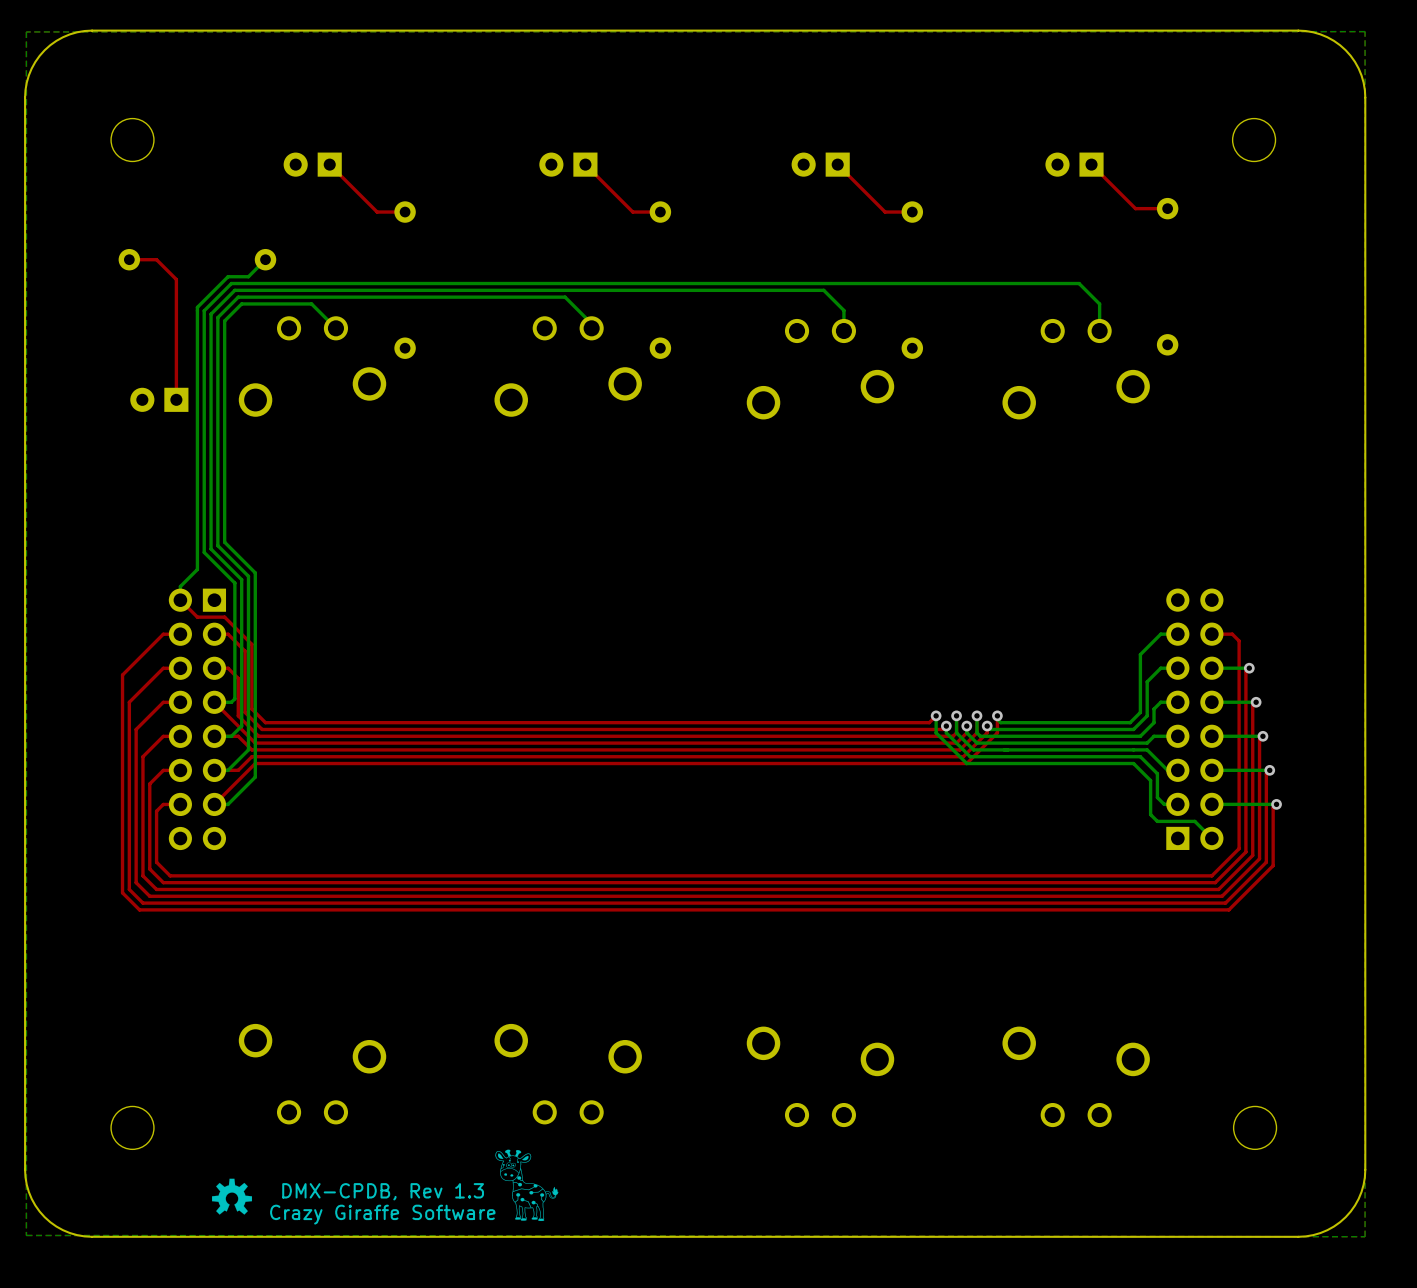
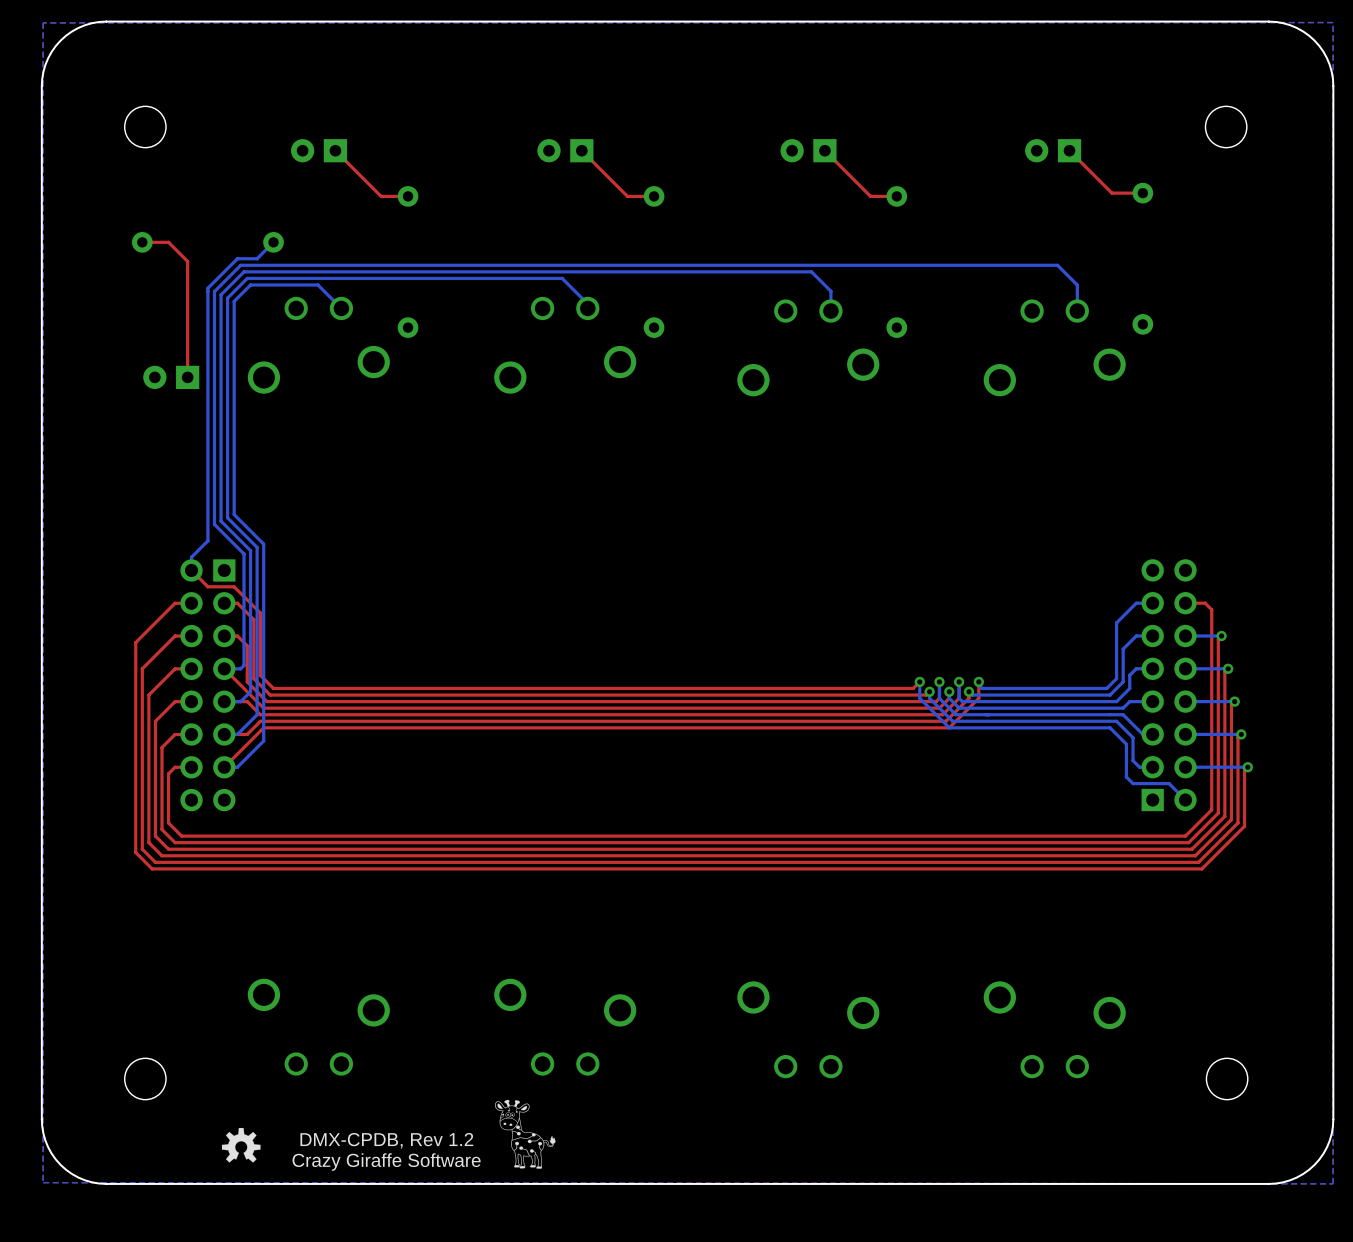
text: DMX-CPDB, Rev 1.3 (383, 1191) -> DMX-CPDB, Rev 1.2 (386, 1140)

